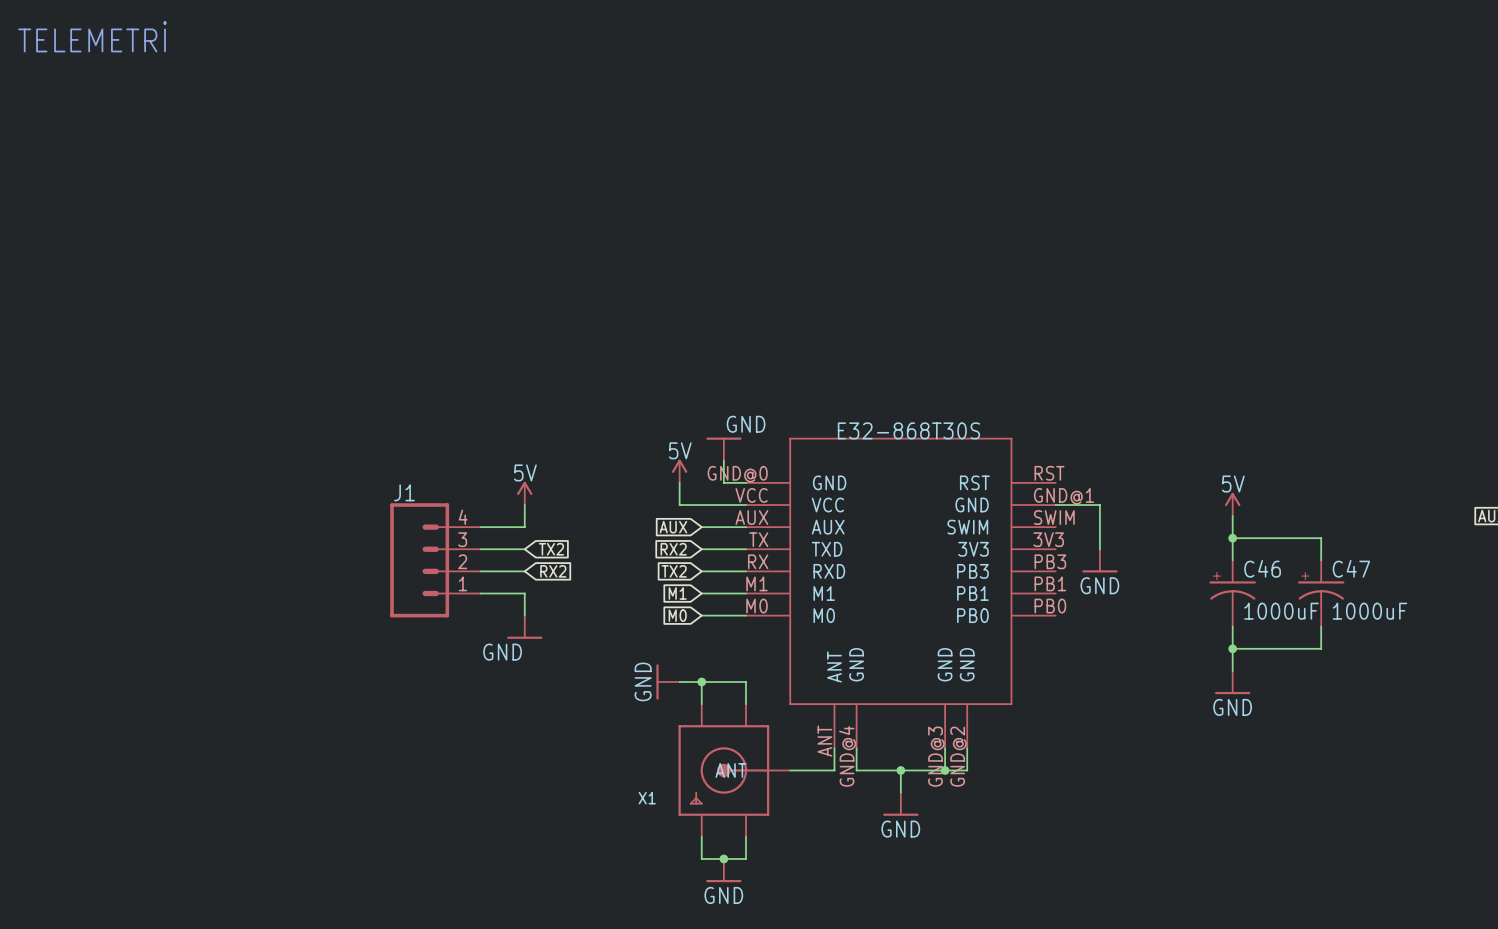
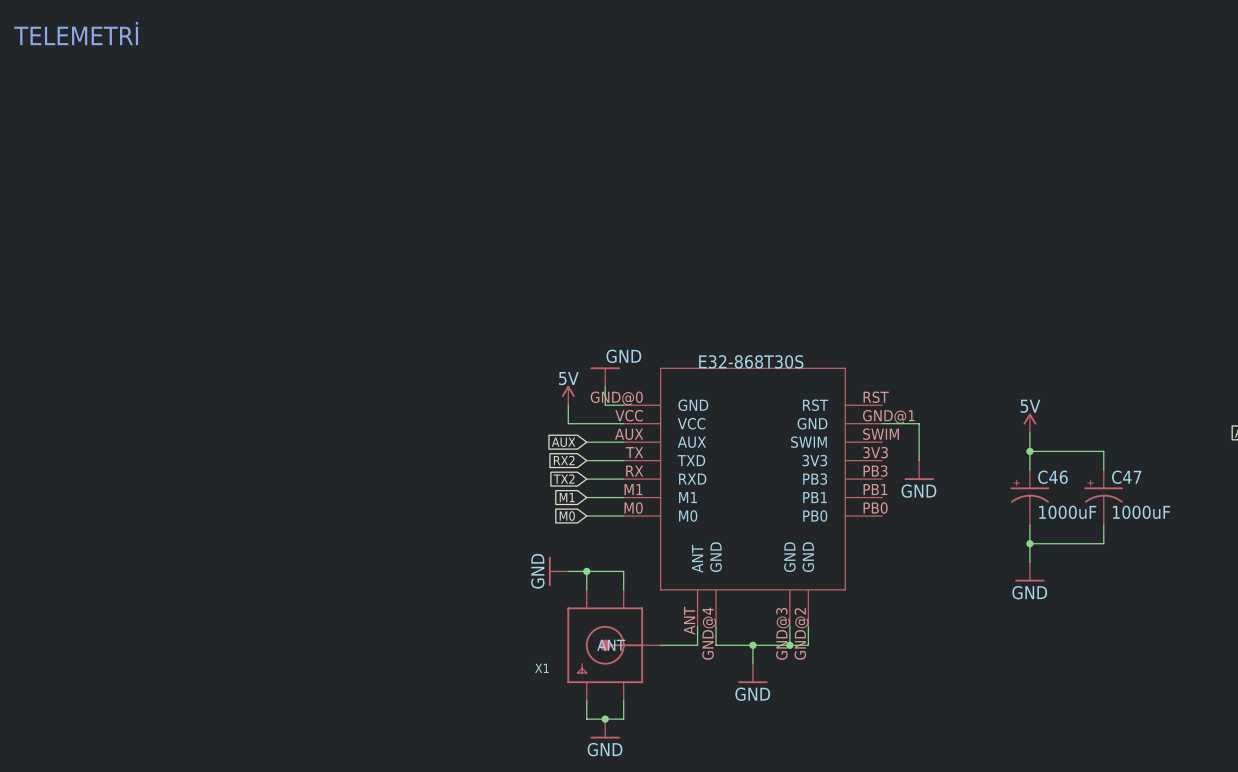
power symbol: 5V (524, 493) -> none
wire: (524, 505) (524, 527) (480, 527) -> none
wire: (480, 549) (524, 549) -> none
global label: TX2 (551, 549) -> none
J1: (435, 560) -> none
wire: (480, 571) (524, 571) -> none
global label: RX2 (553, 571) -> none
wire: (480, 593) (524, 593) (524, 615) -> none
power symbol: GND (524, 627) -> none

